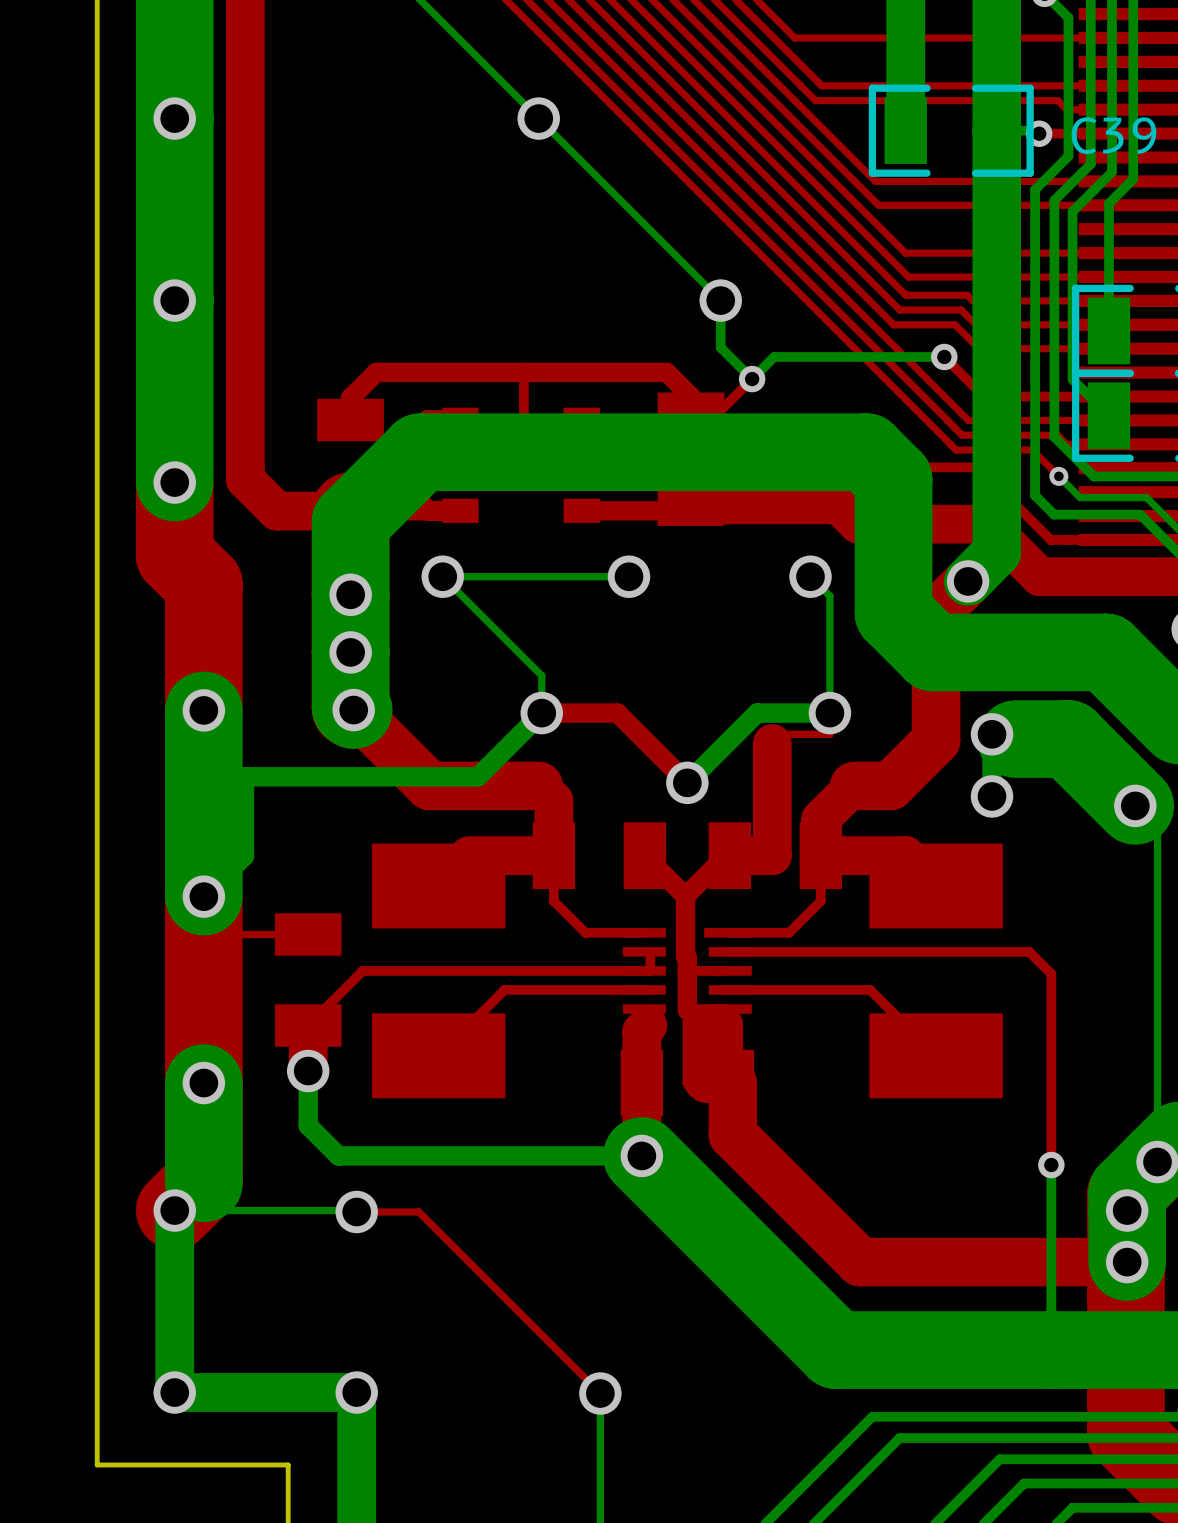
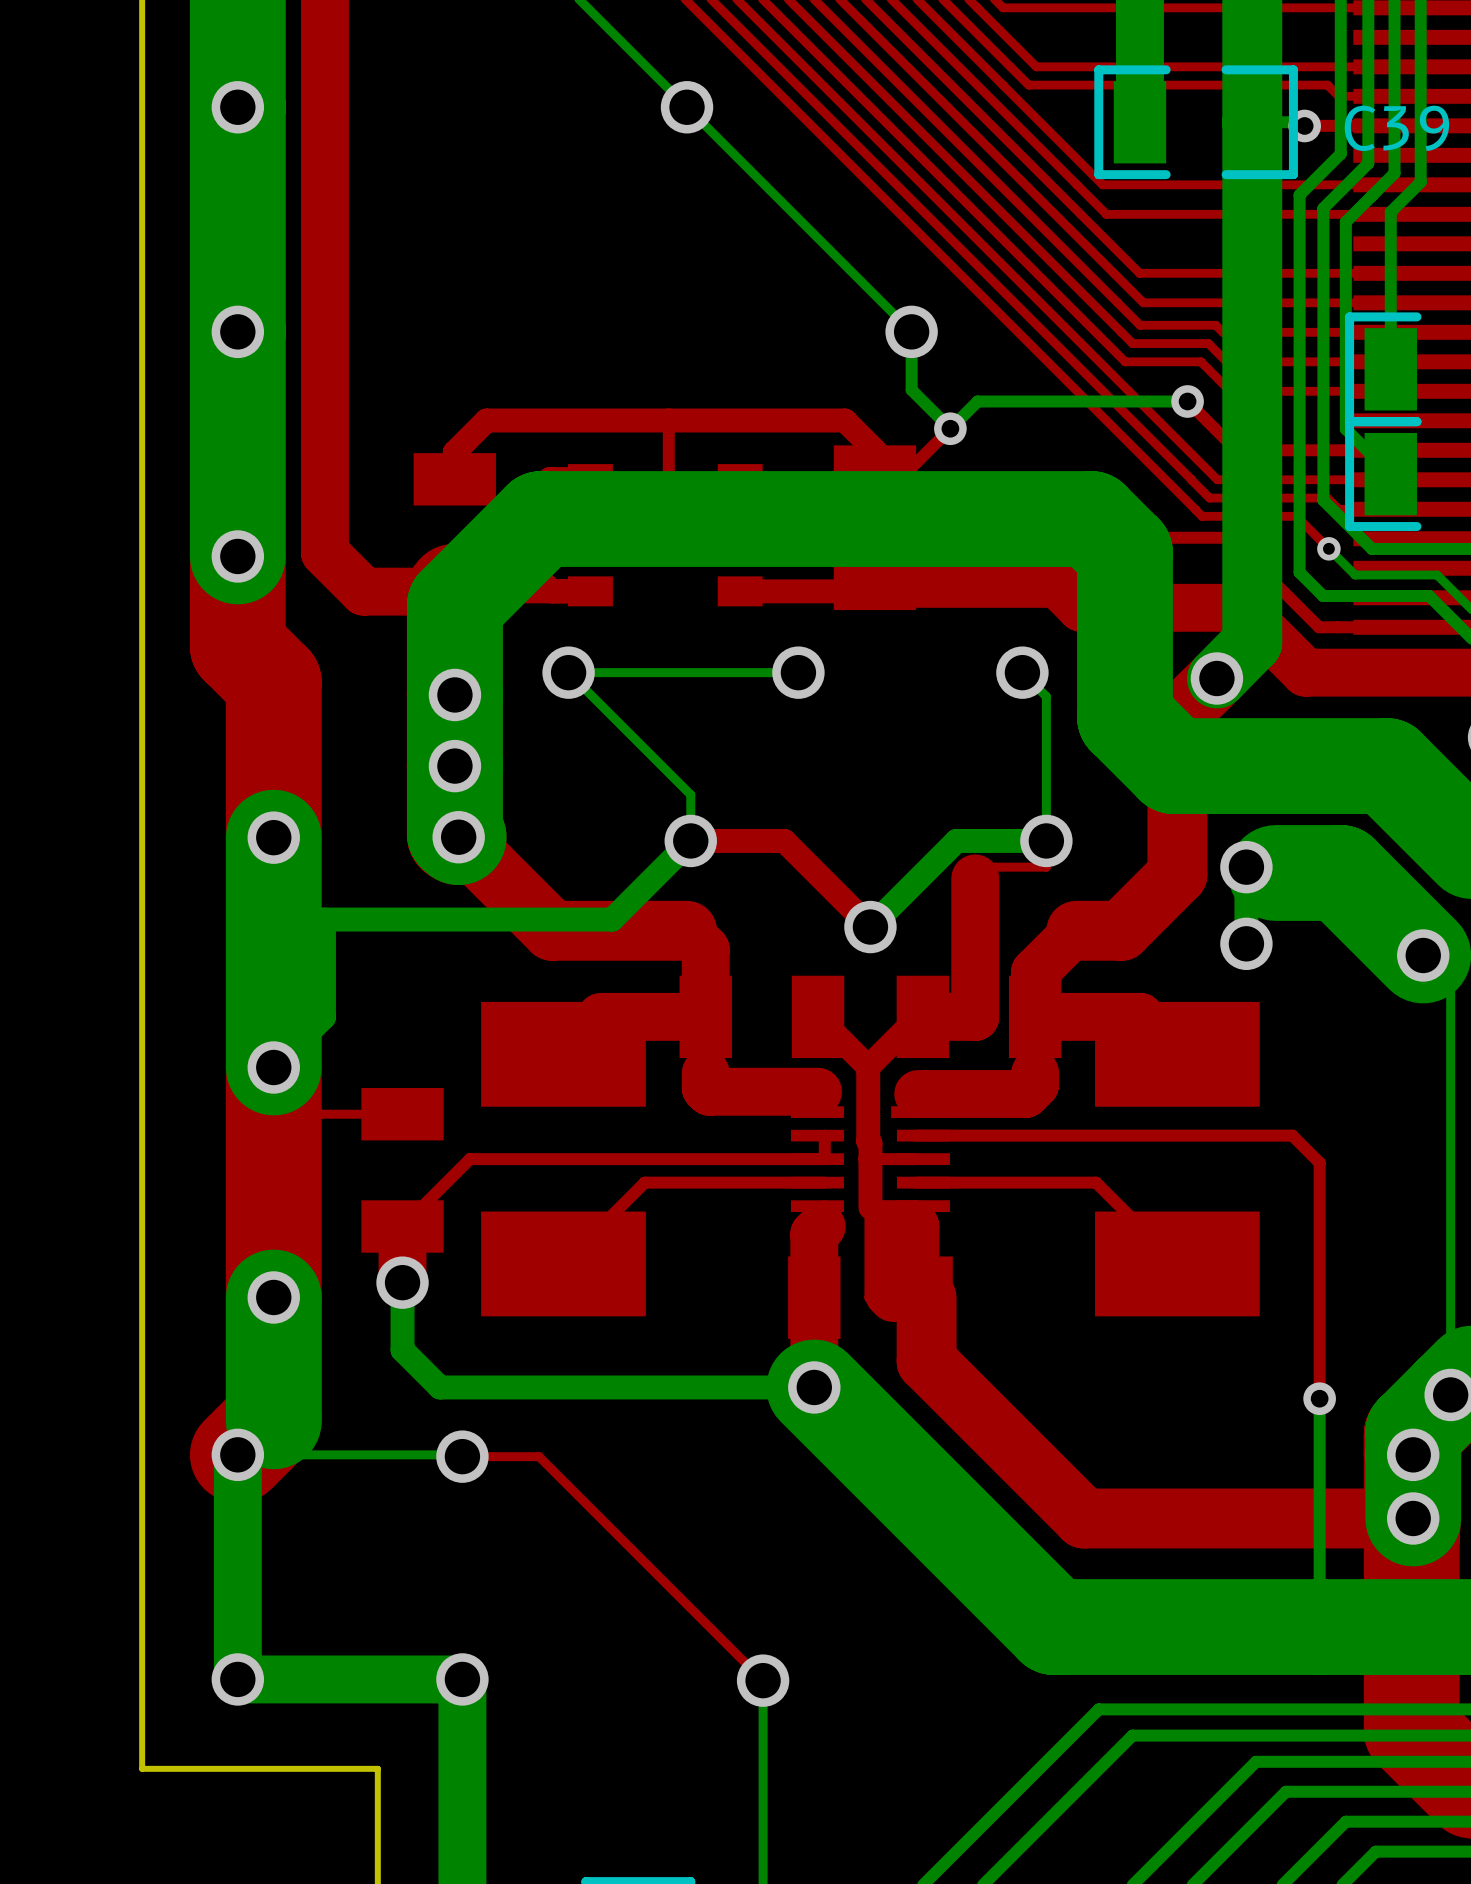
top track: (553, 901) (585, 932) (644, 932) -> (705, 1073) (705, 1088) (709, 1091) (818, 1091) (825, 1111)
top track: (820, 901) (789, 932) (728, 932) -> (1035, 1073) (1035, 1084) (1025, 1094) (918, 1094) (911, 1110) (913, 1112)

